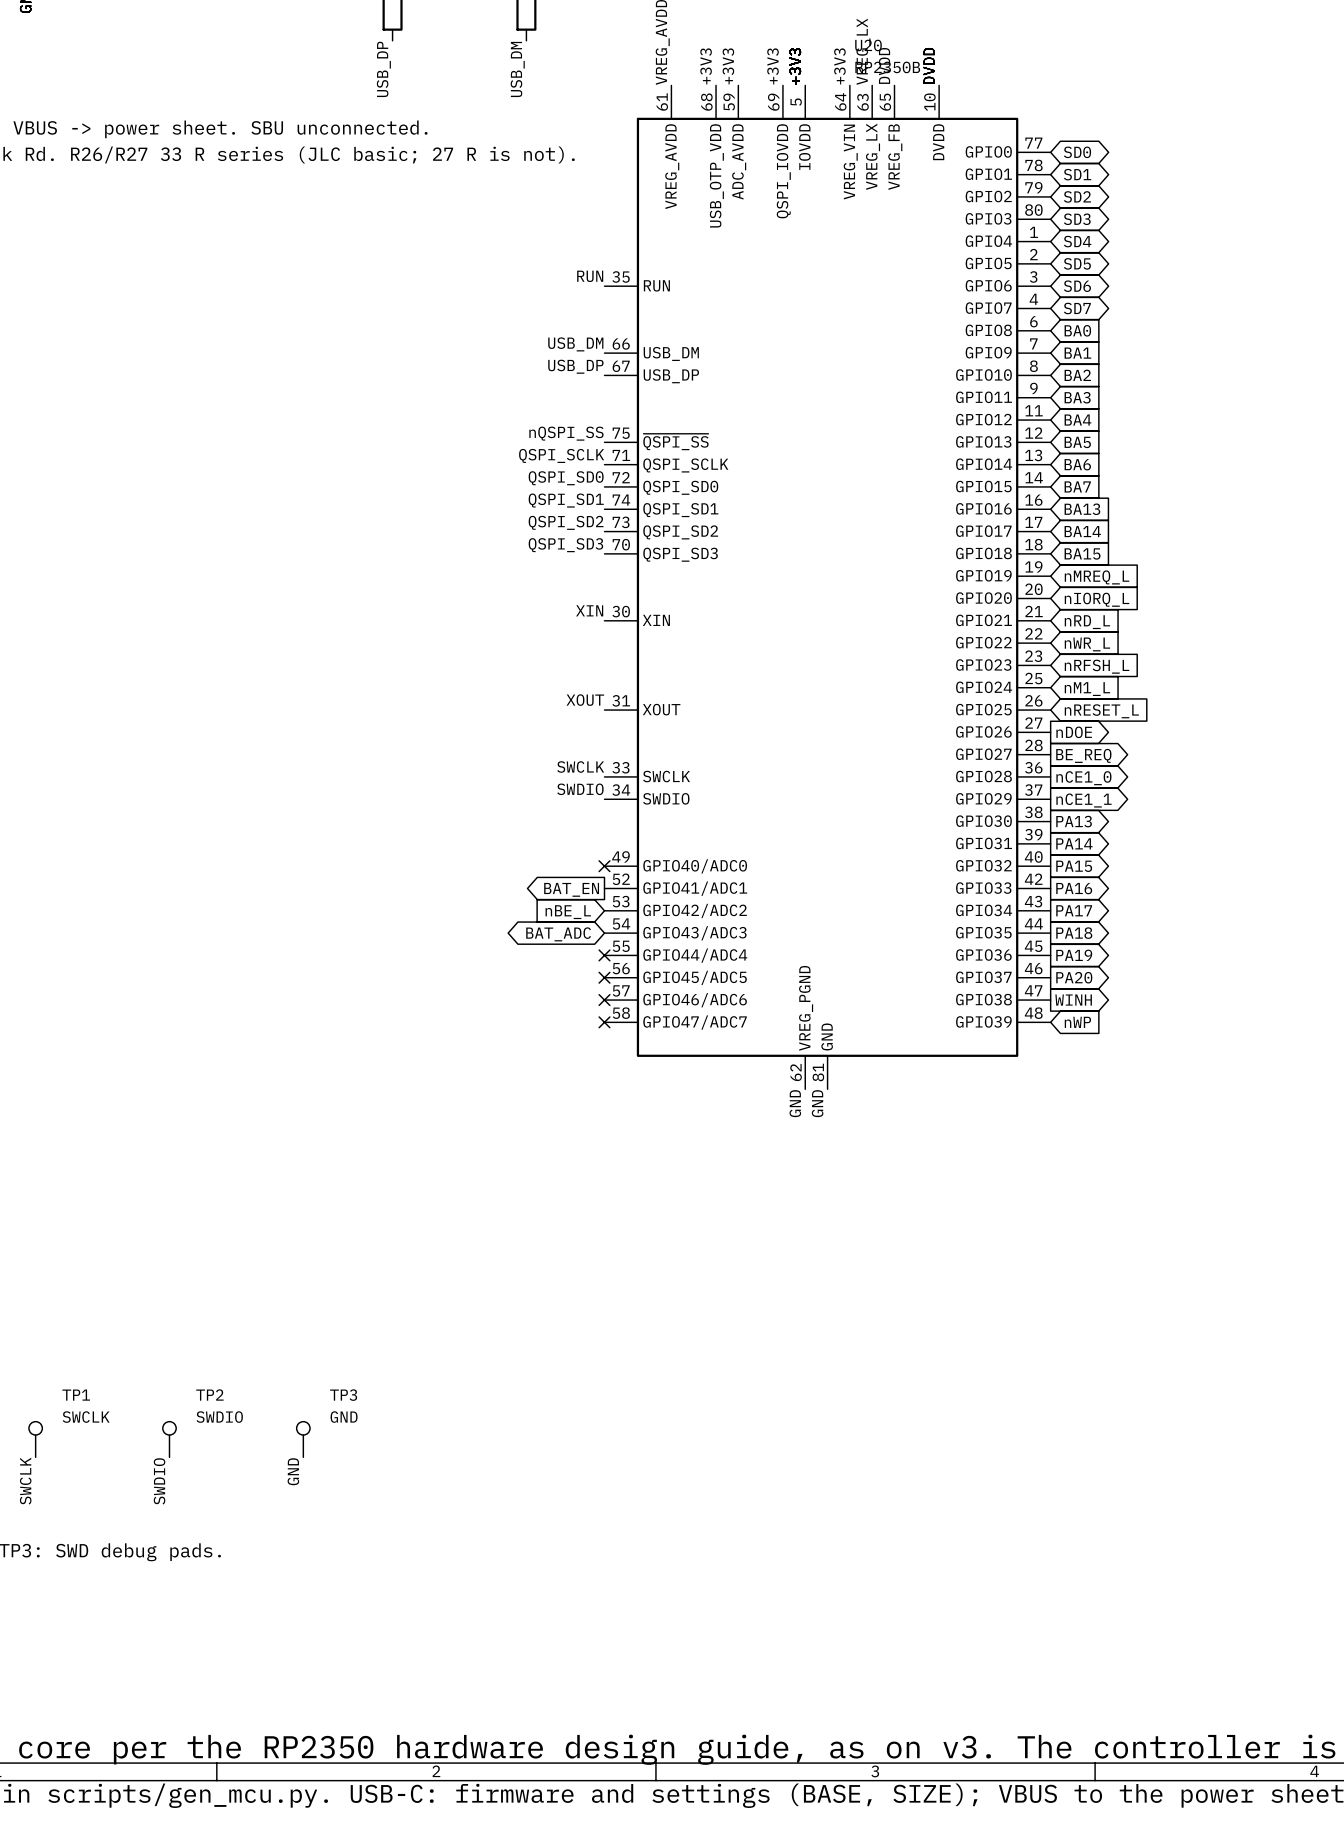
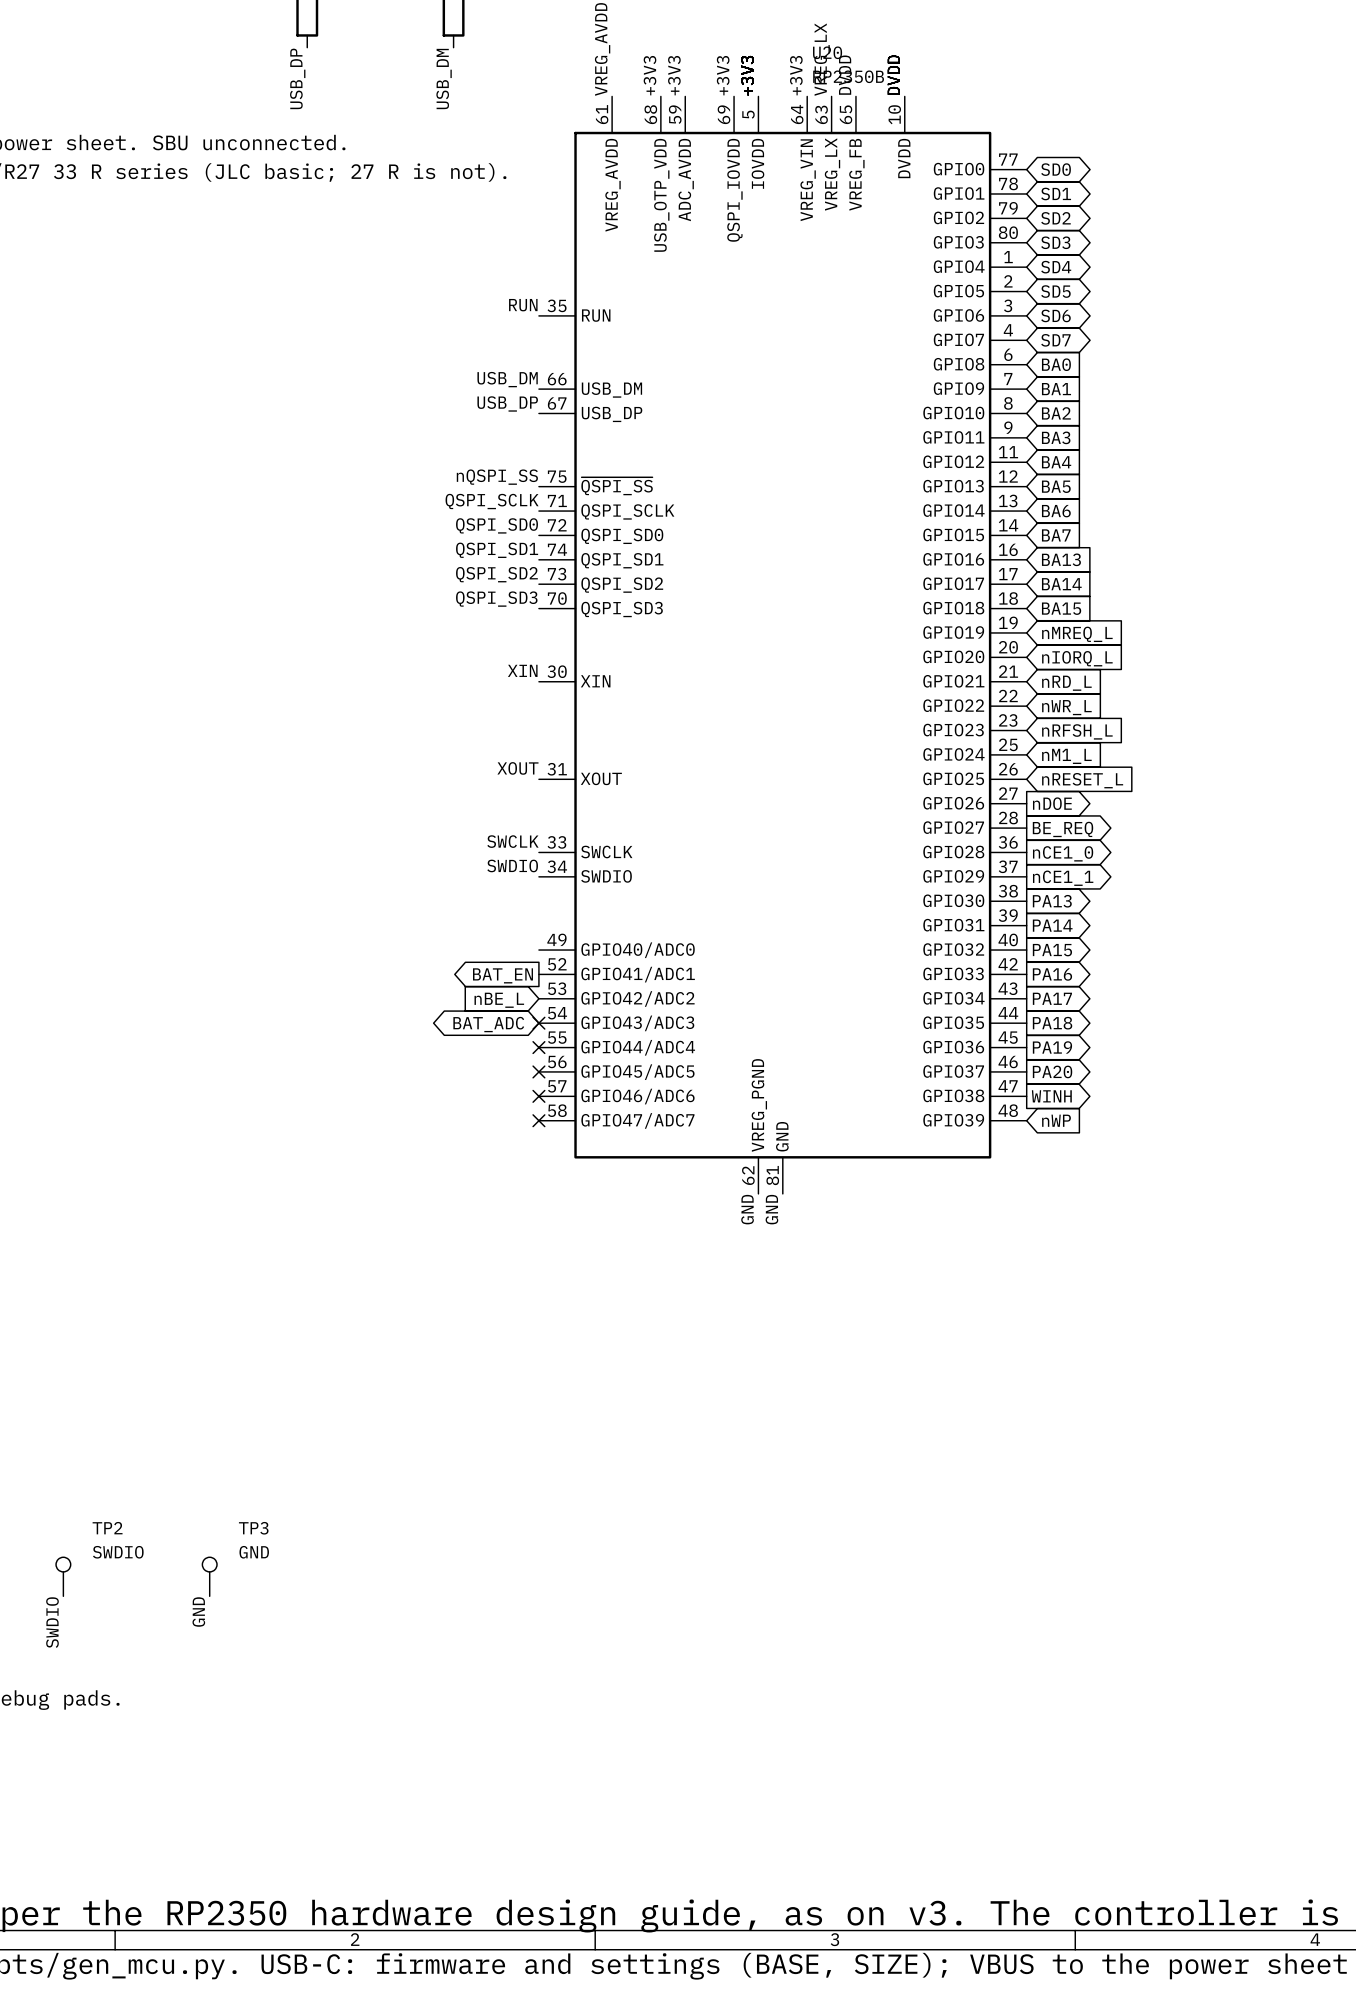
no-connect mark: (604, 866) -> none
no-connect mark: none -> (538, 1023)

